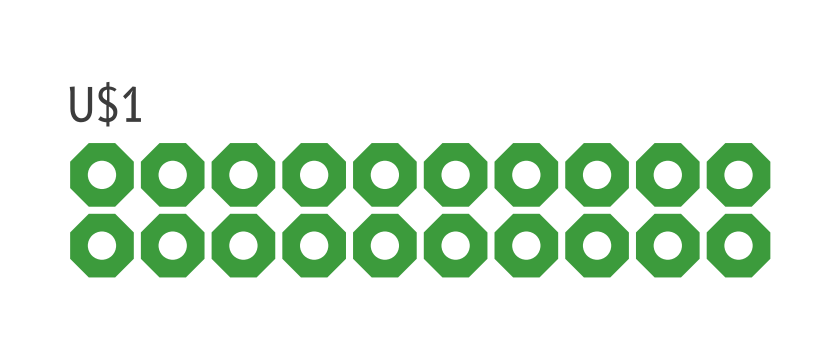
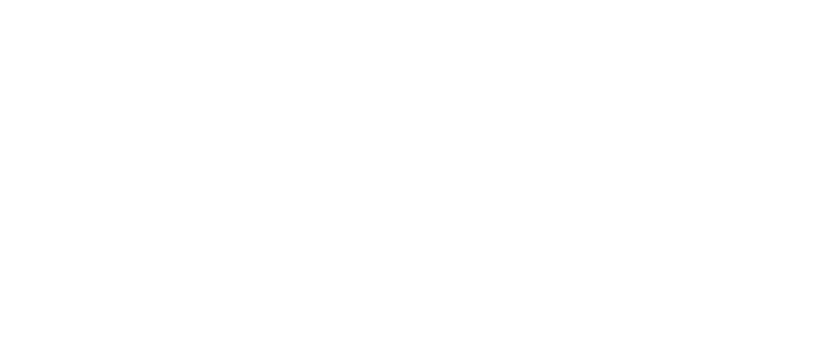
U$1: (420, 210) -> none

